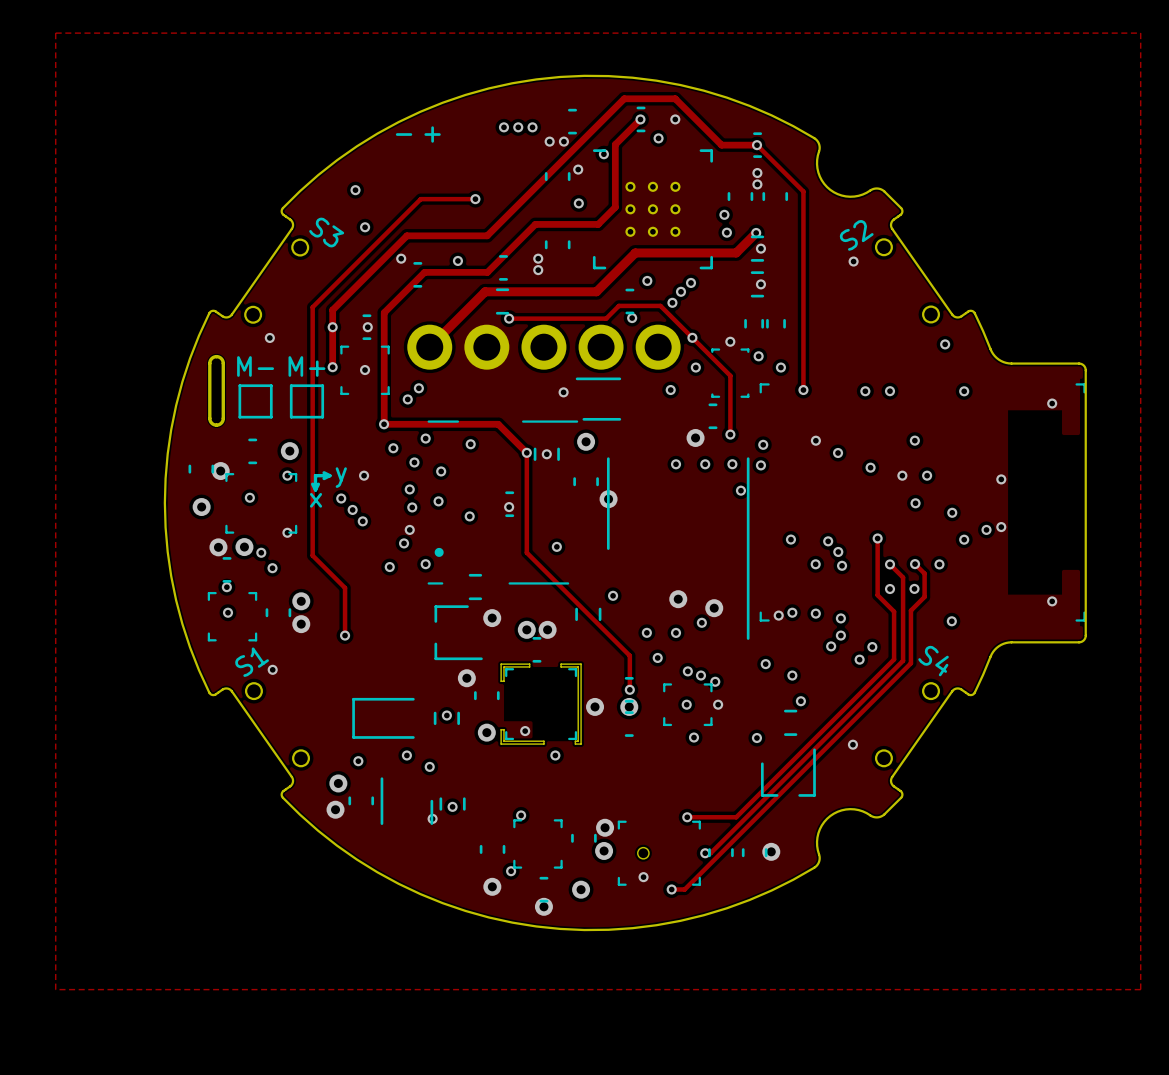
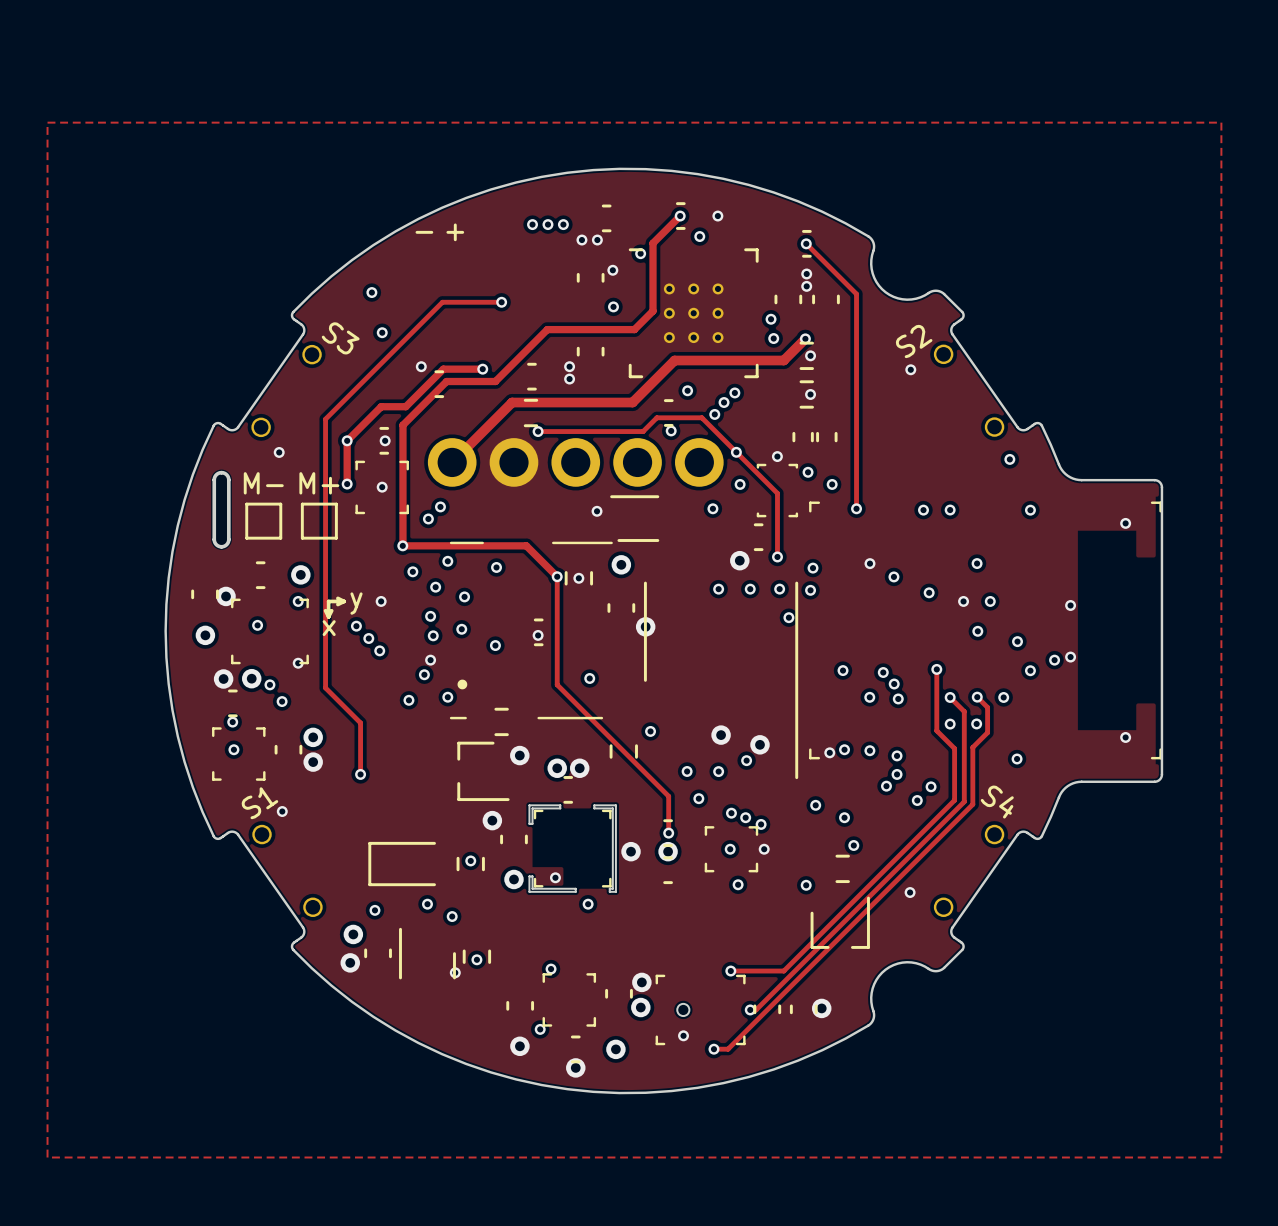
track: (757, 145) (721, 145) (675, 98) (624, 98) (487, 235) (406, 235) (332, 310) (332, 327) -> (482, 369) (443, 369) (405, 406) (381, 406) (347, 440)
track: (535, 224) (487, 272) (469, 272) -> (566, 329) (547, 329) (495, 381)

